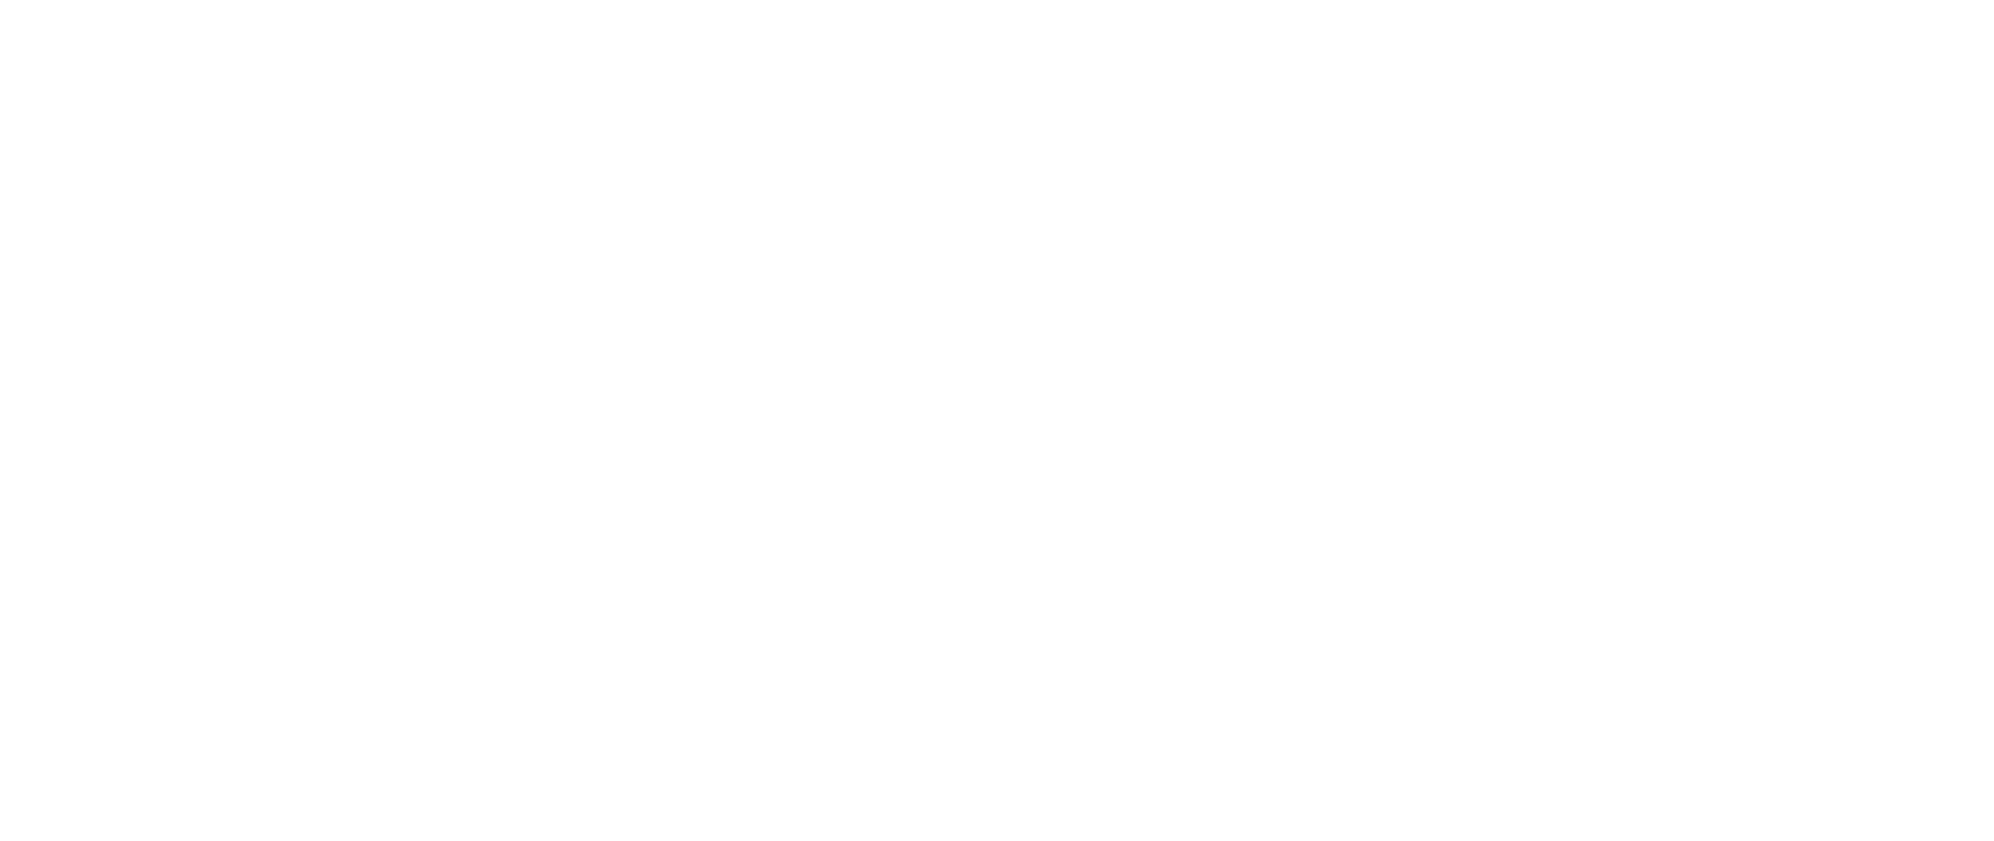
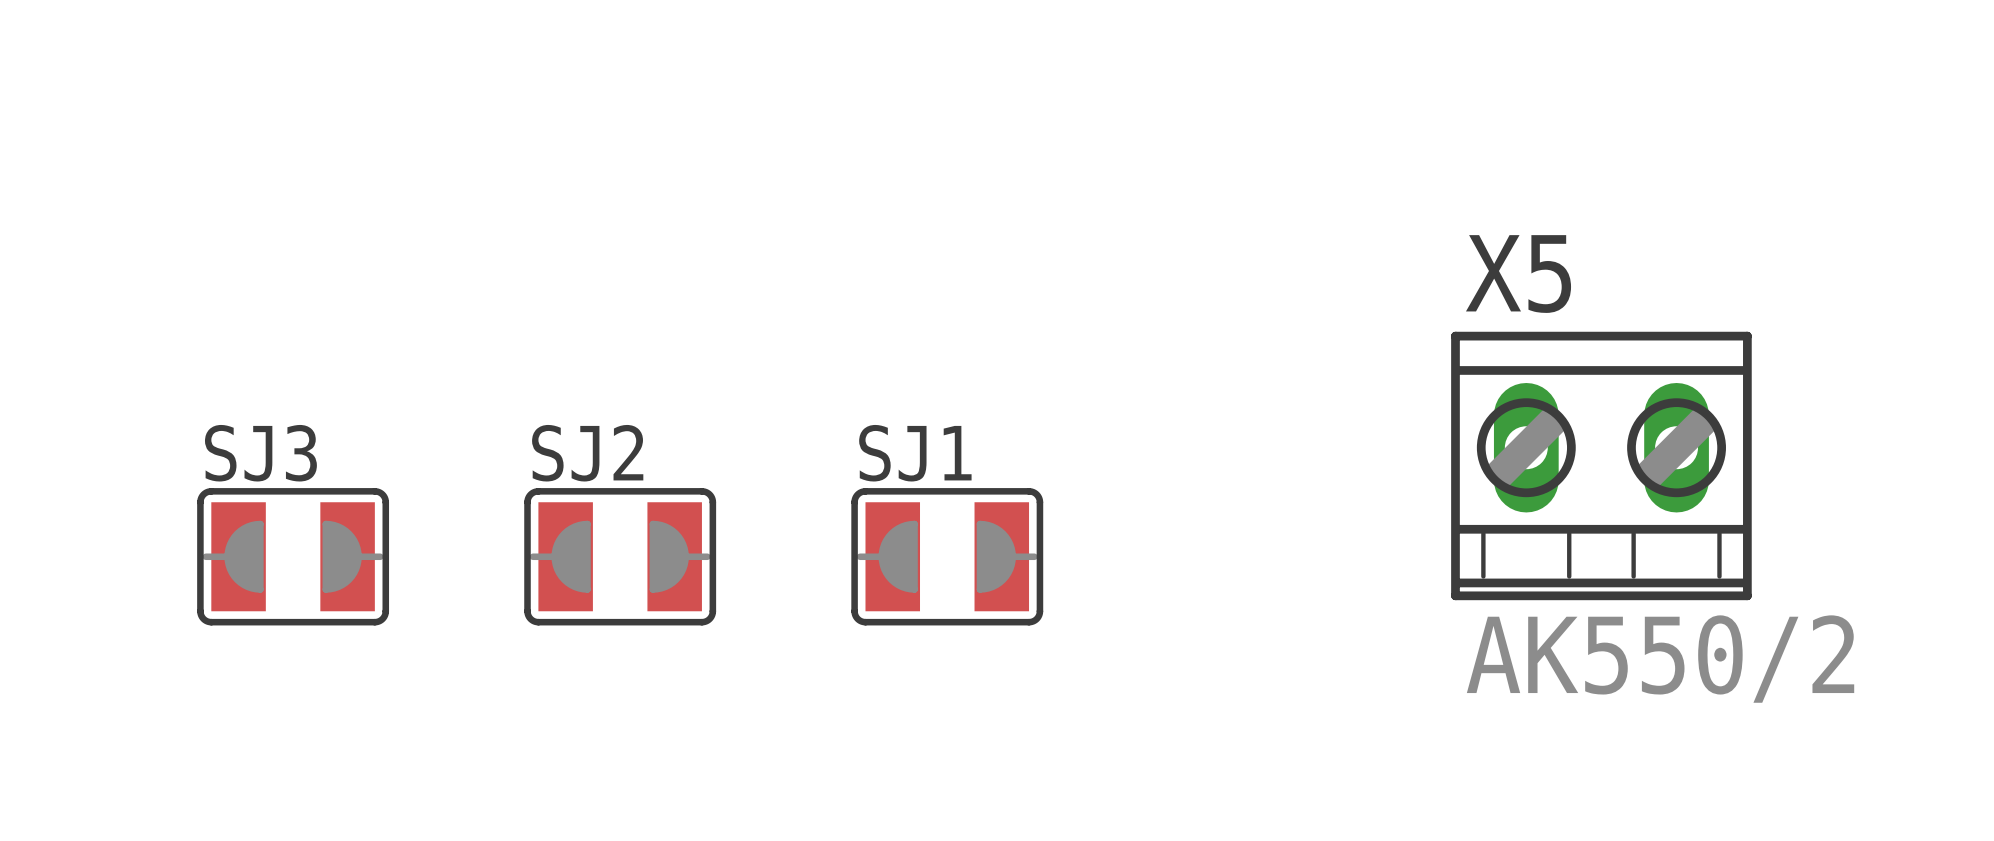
X5: none -> AK550/2 (1601, 465)
SJ3: none -> (293, 556)
SJ2: none -> (620, 556)
SJ1: none -> (947, 556)

